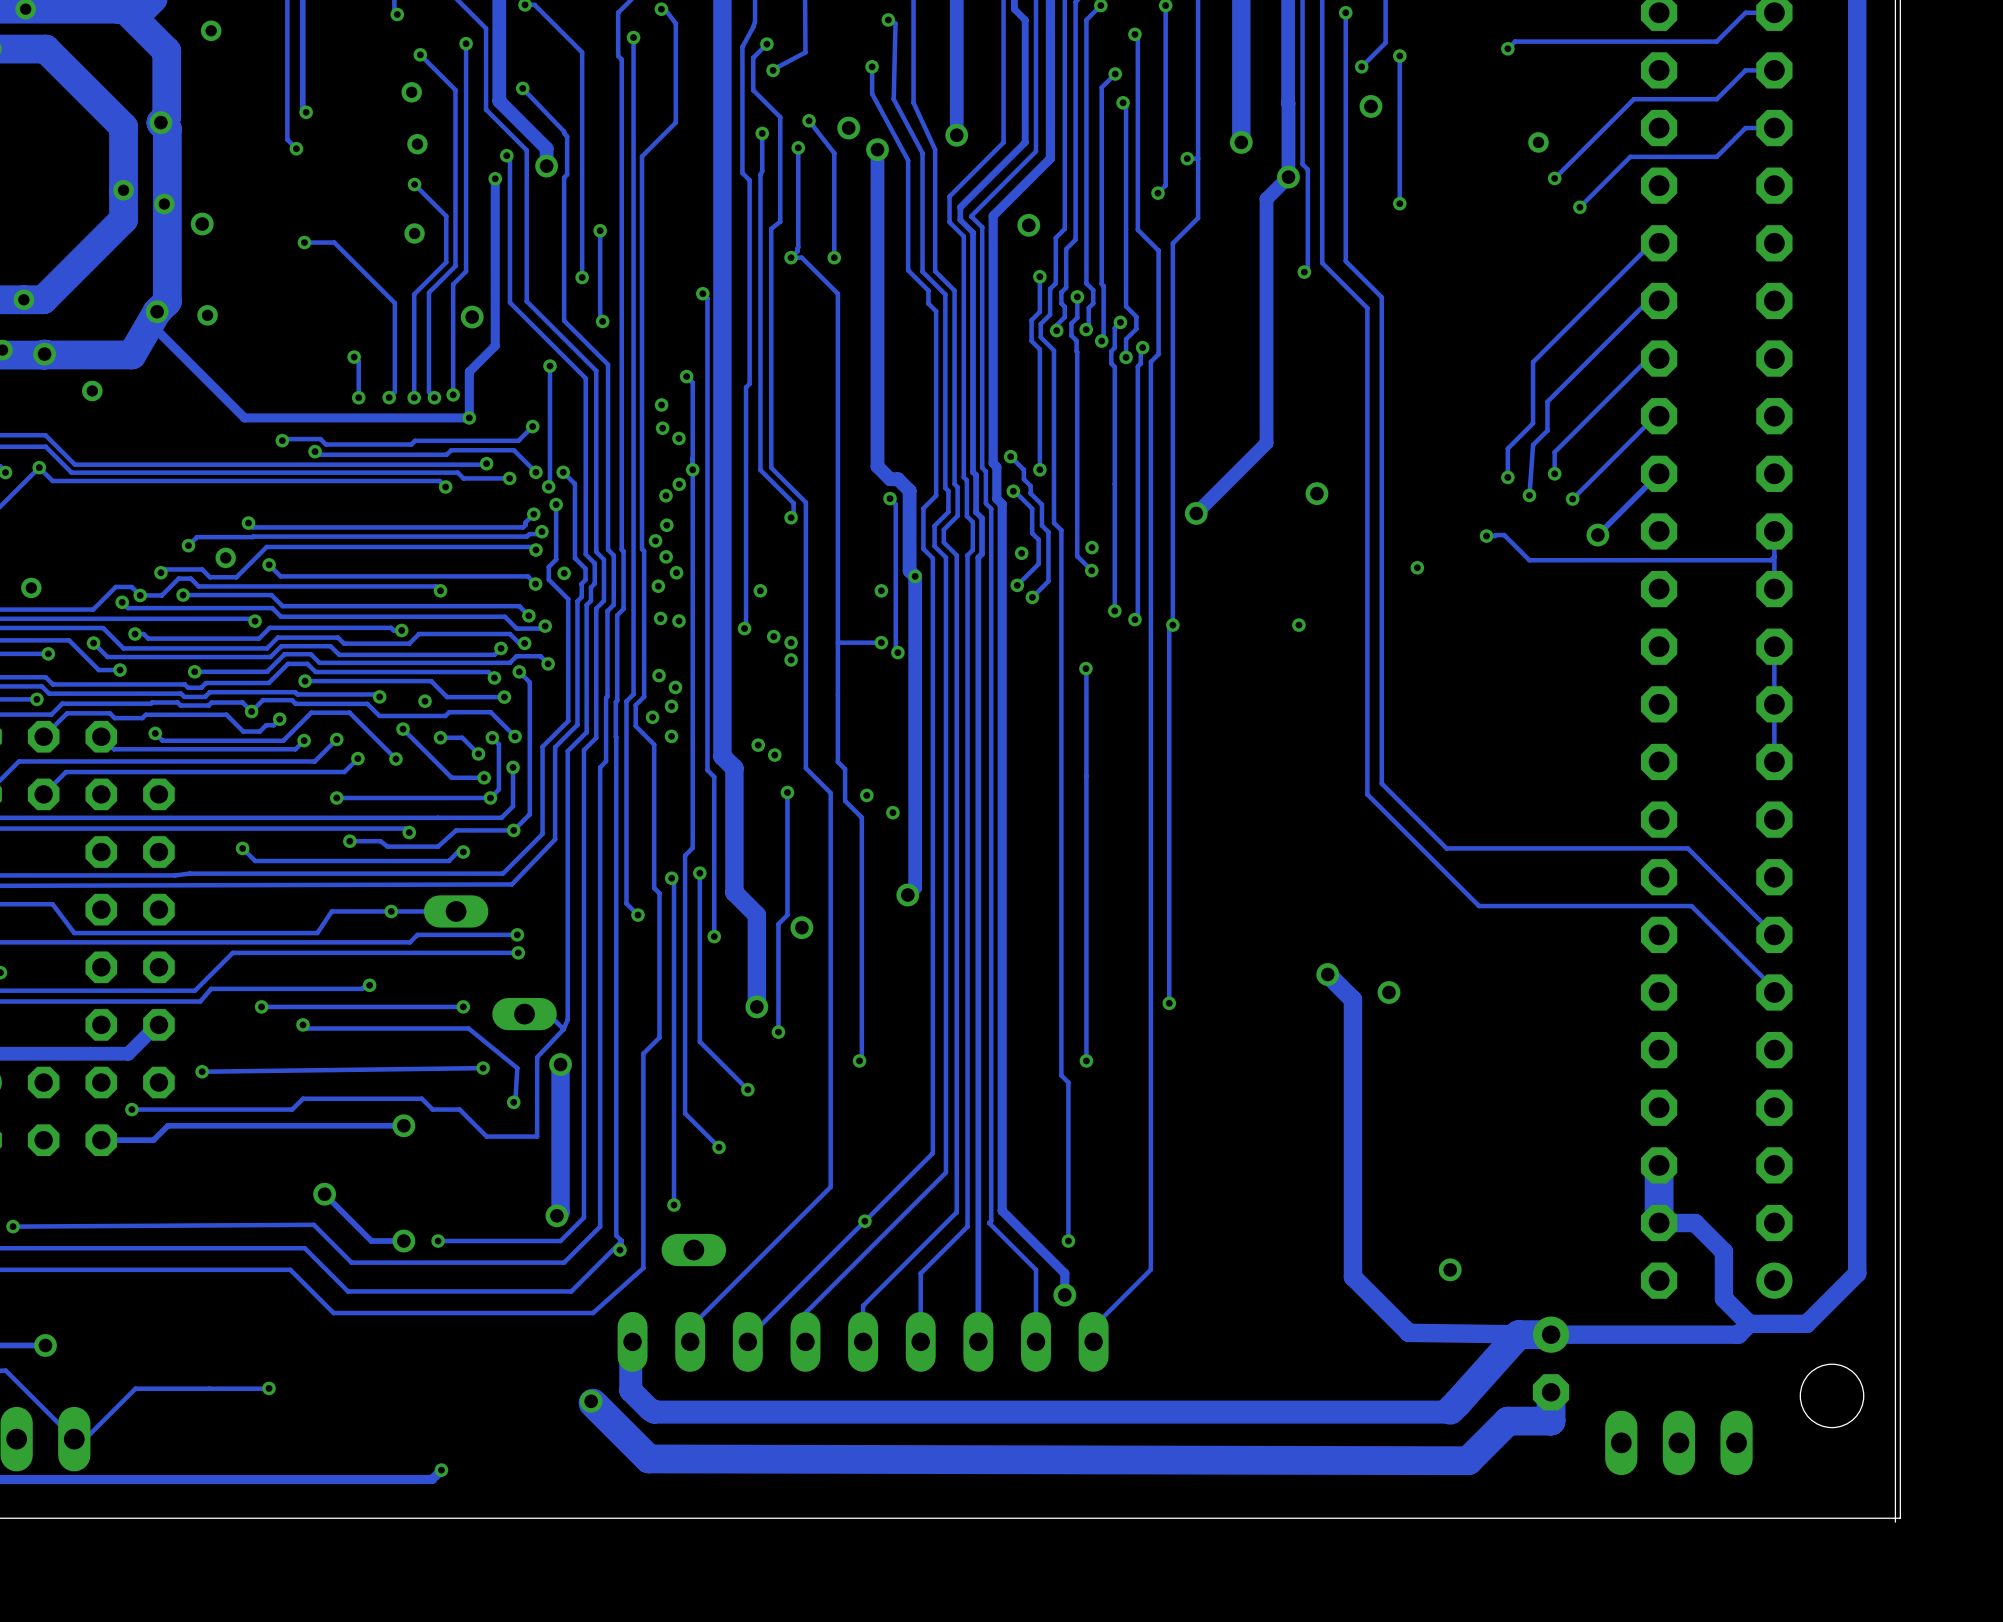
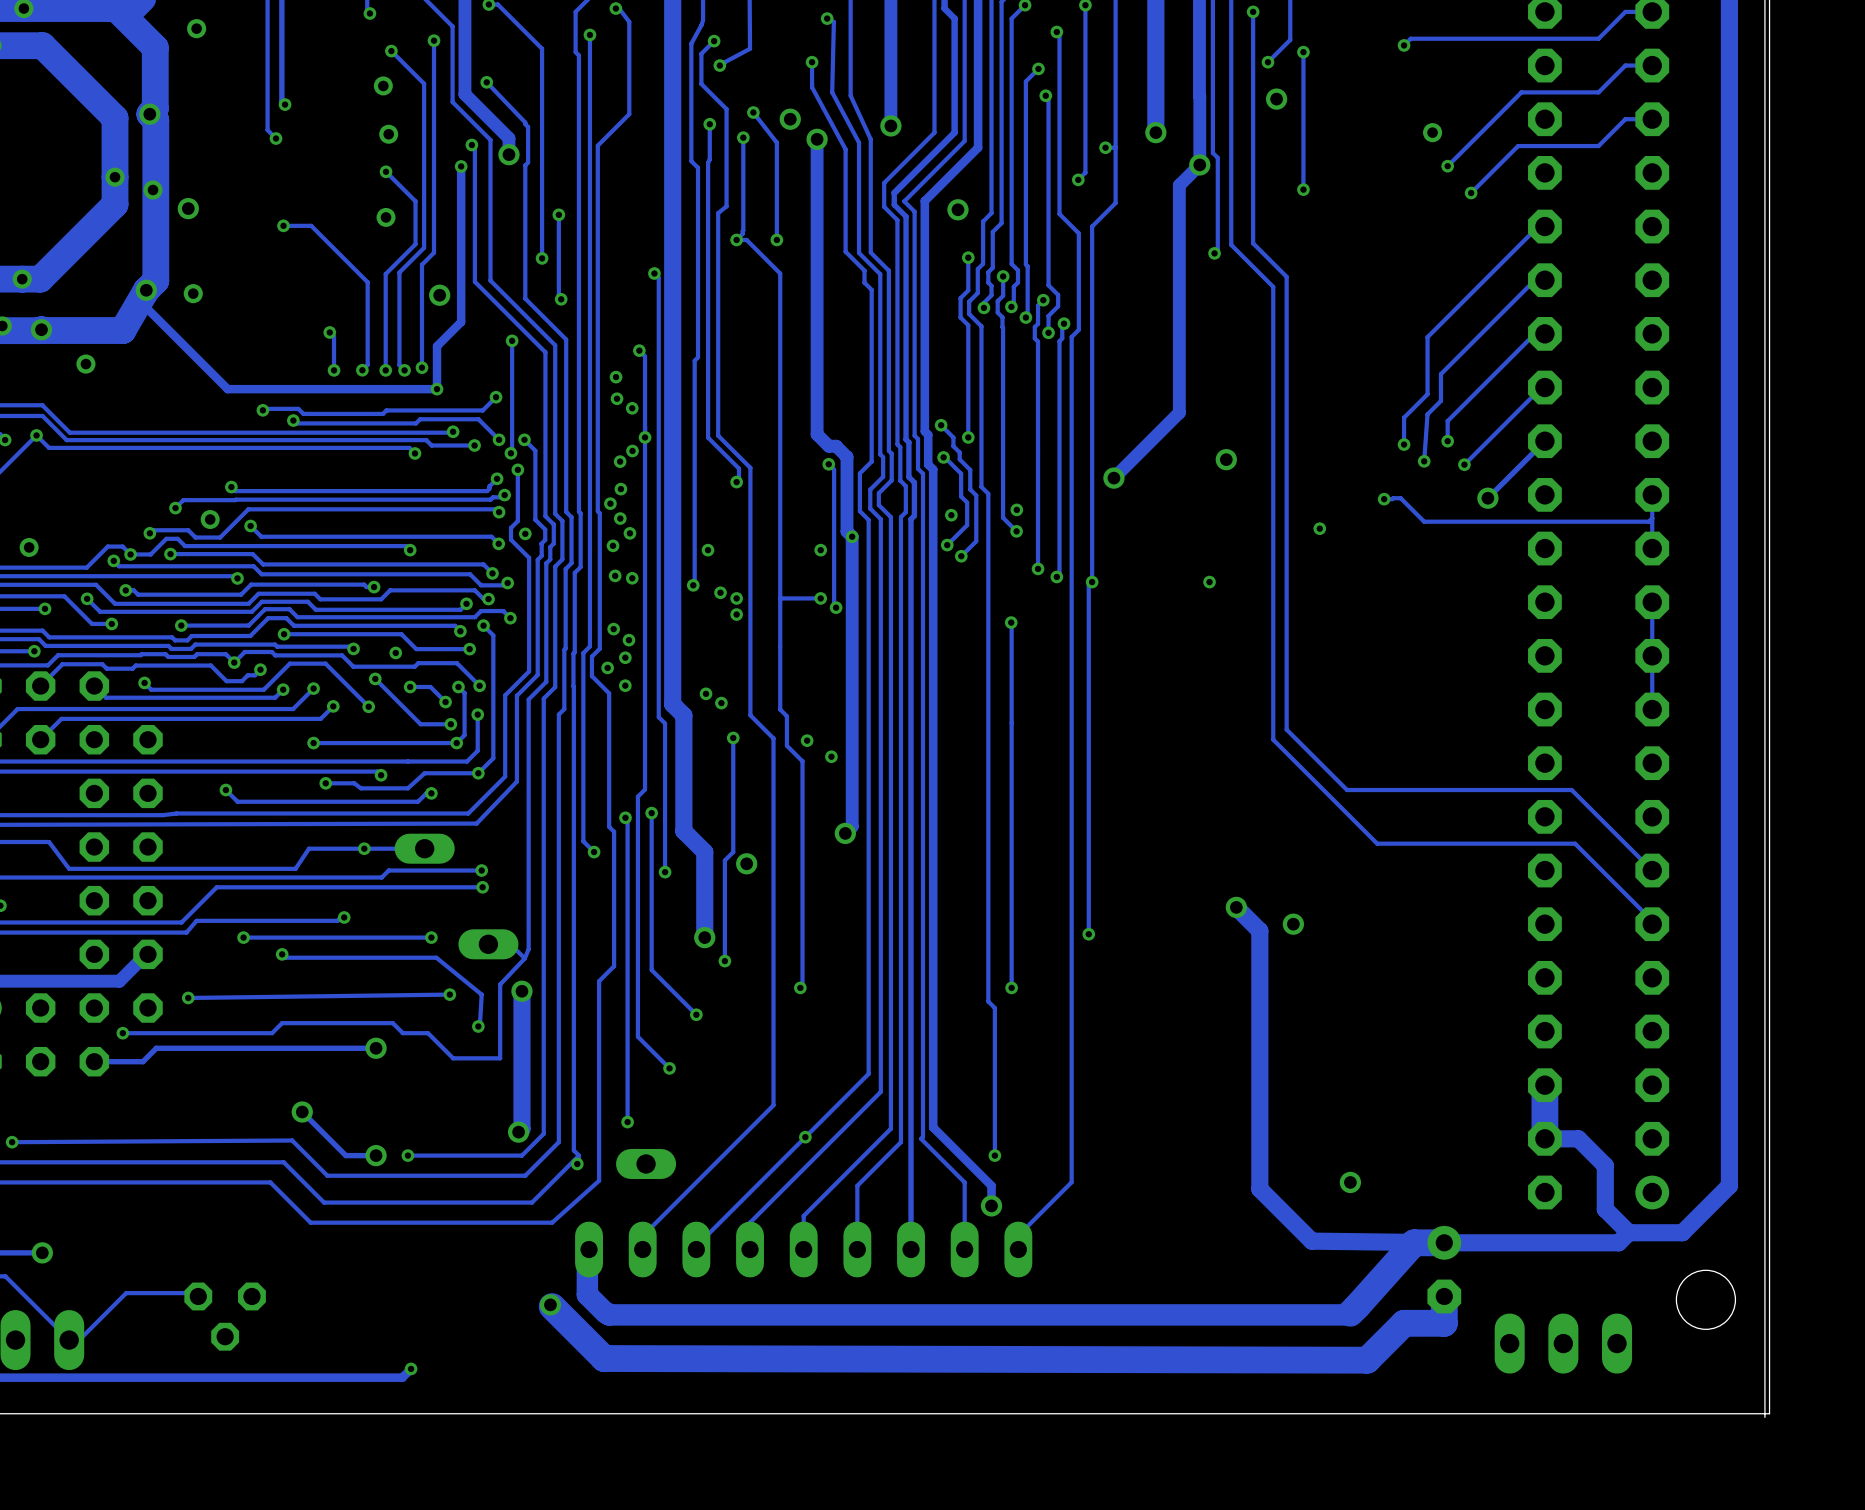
track: (268, 1388) (209, 1388) -> none
via: (269, 1388) -> none
part: none -> (225, 1316)

